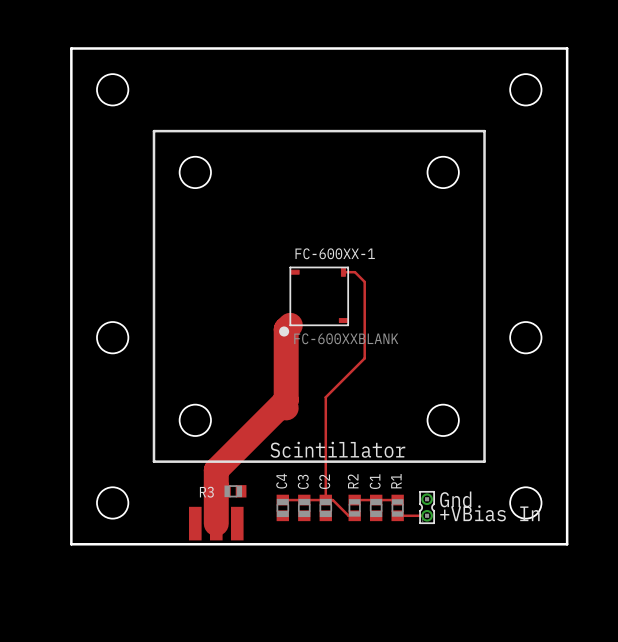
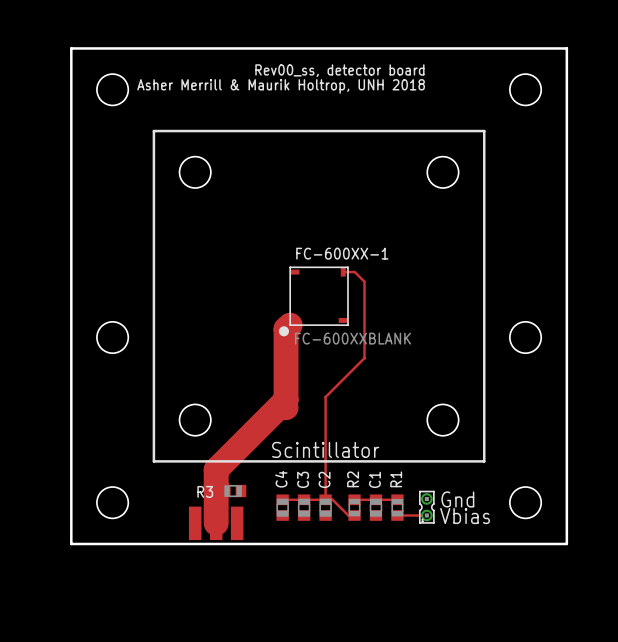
text: none -> Rev00_ss, detector board (339, 70)
text: none -> Asher Merrill & Maurik Holtrop, UNH 2018 (281, 86)
text: +VBias In (489, 513) -> Vbias (465, 515)

